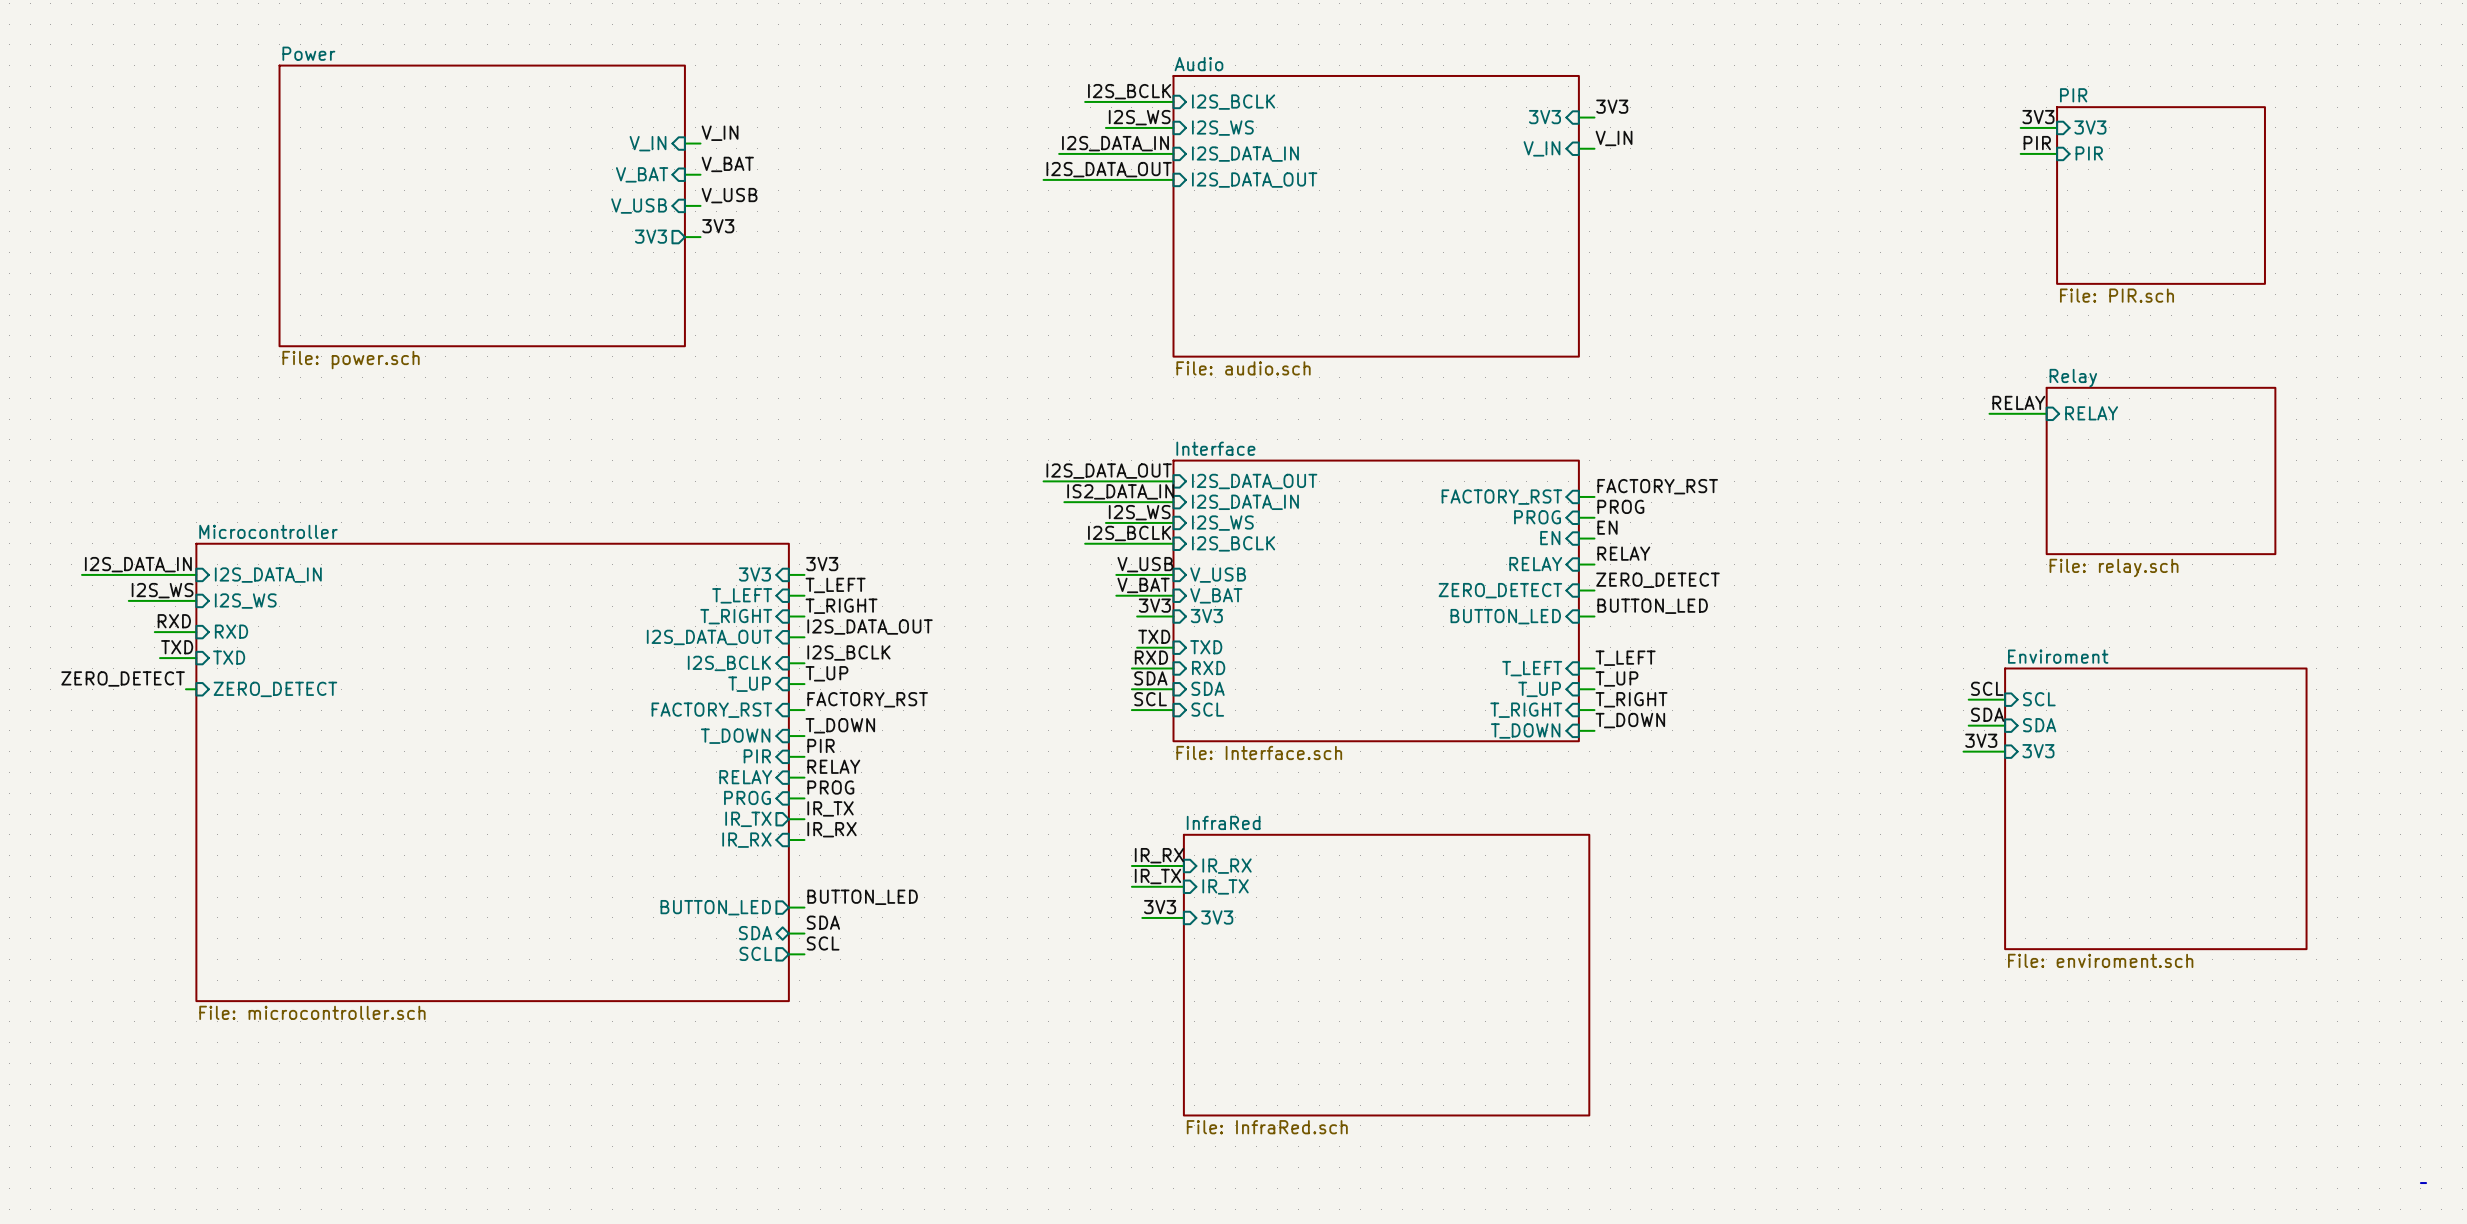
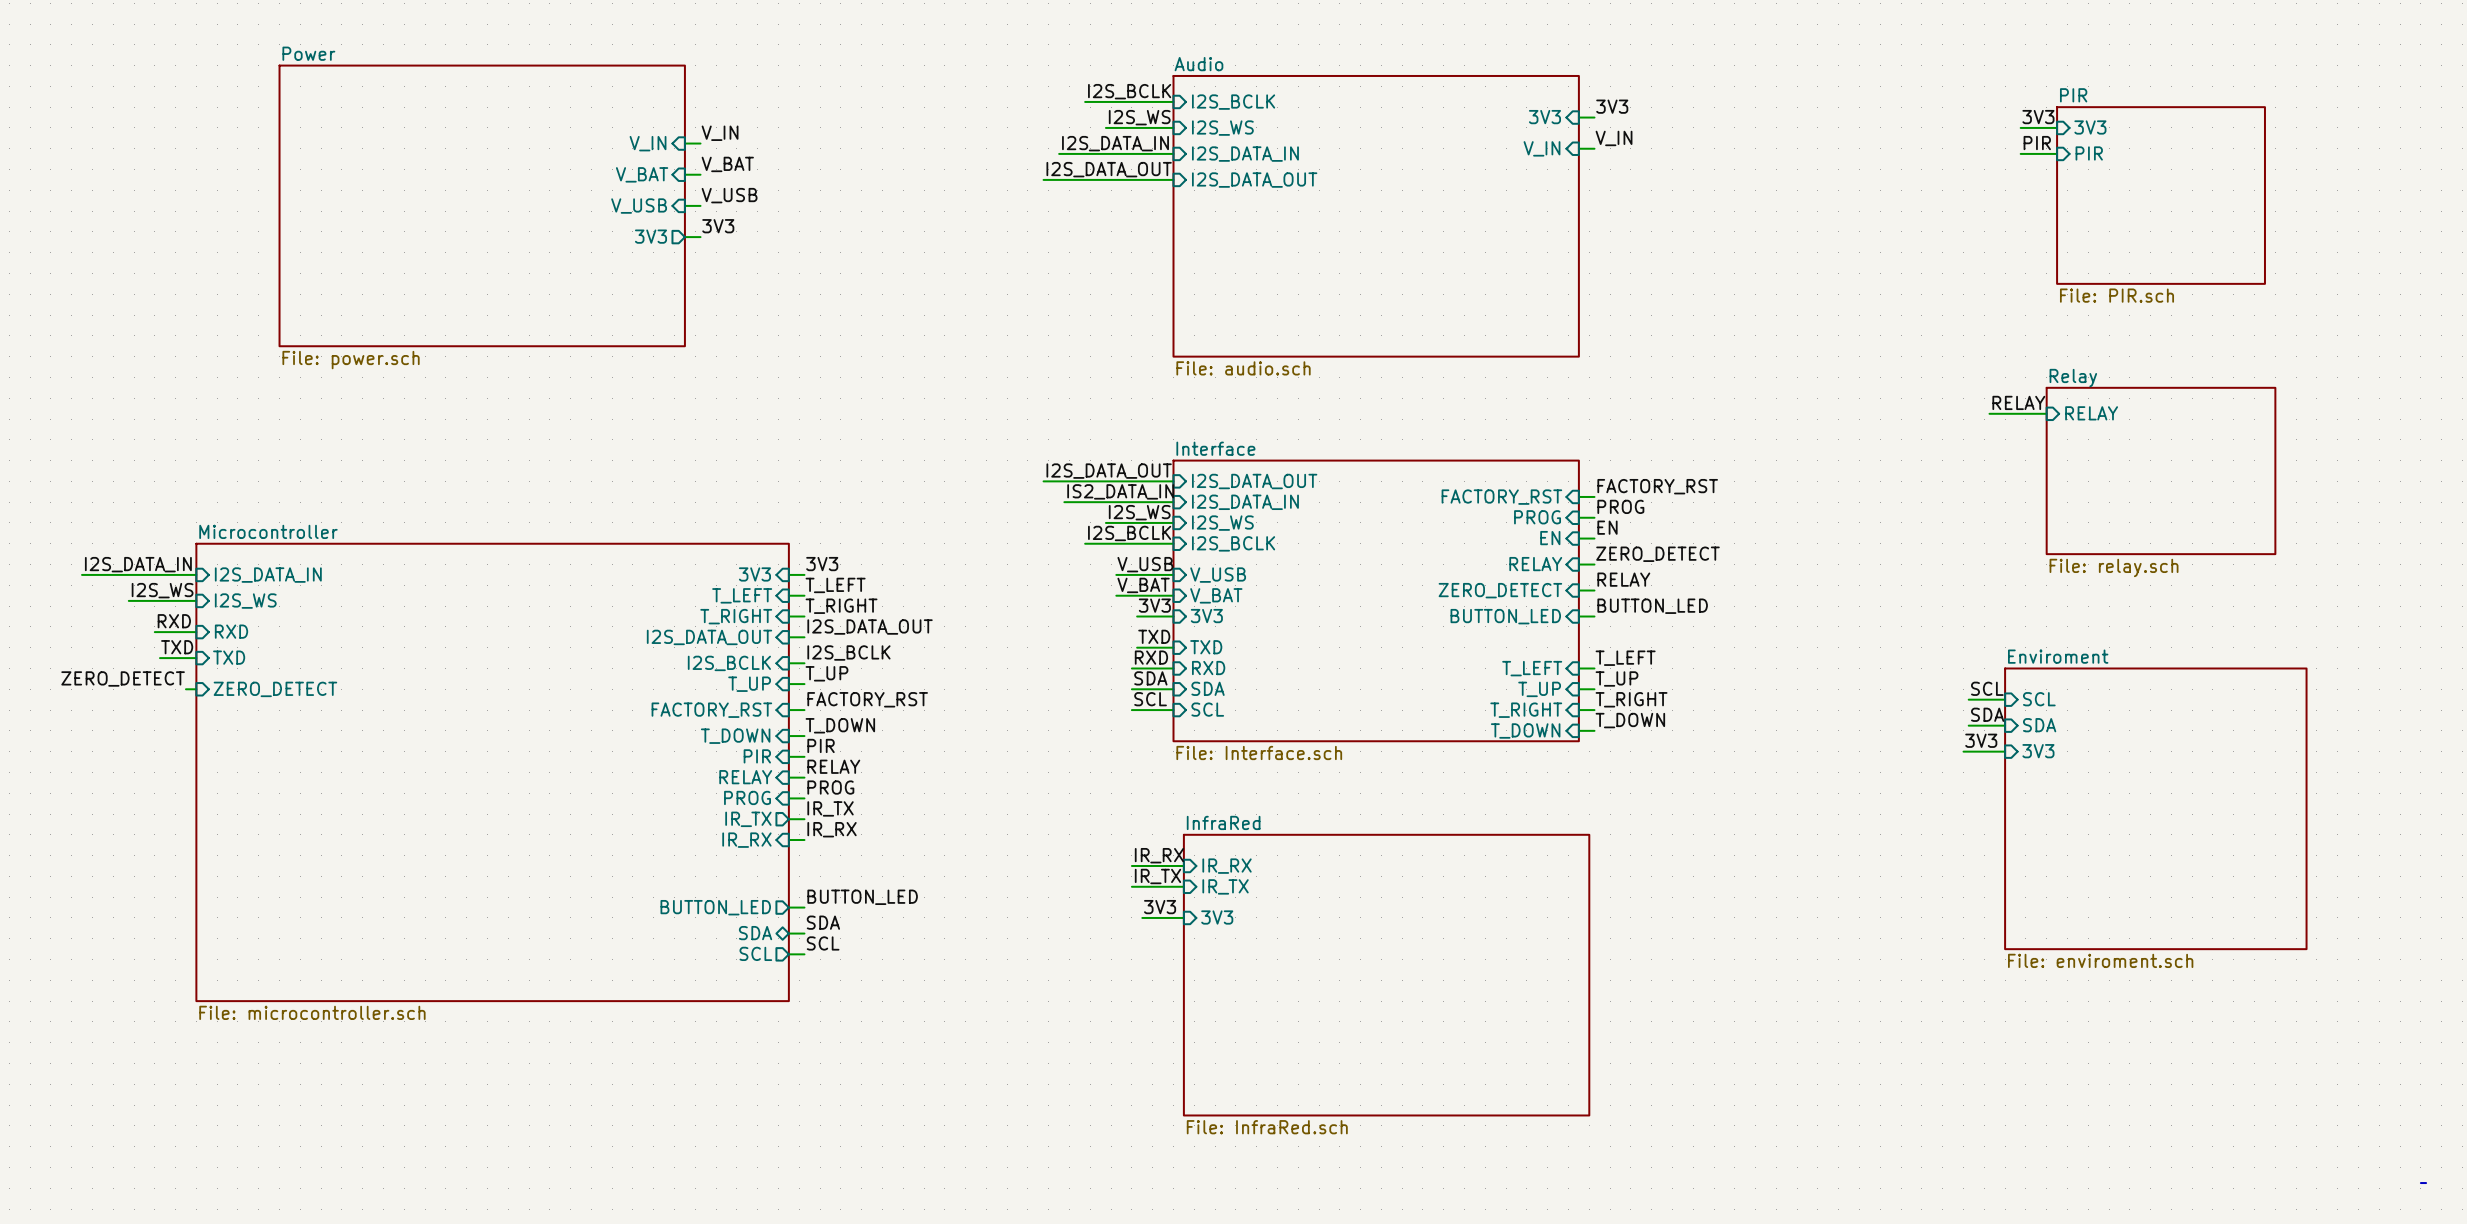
label: RELAY (1623, 553) -> ZERO_DETECT (1657, 554)
label: ZERO_DETECT (1657, 580) -> RELAY (1623, 579)

